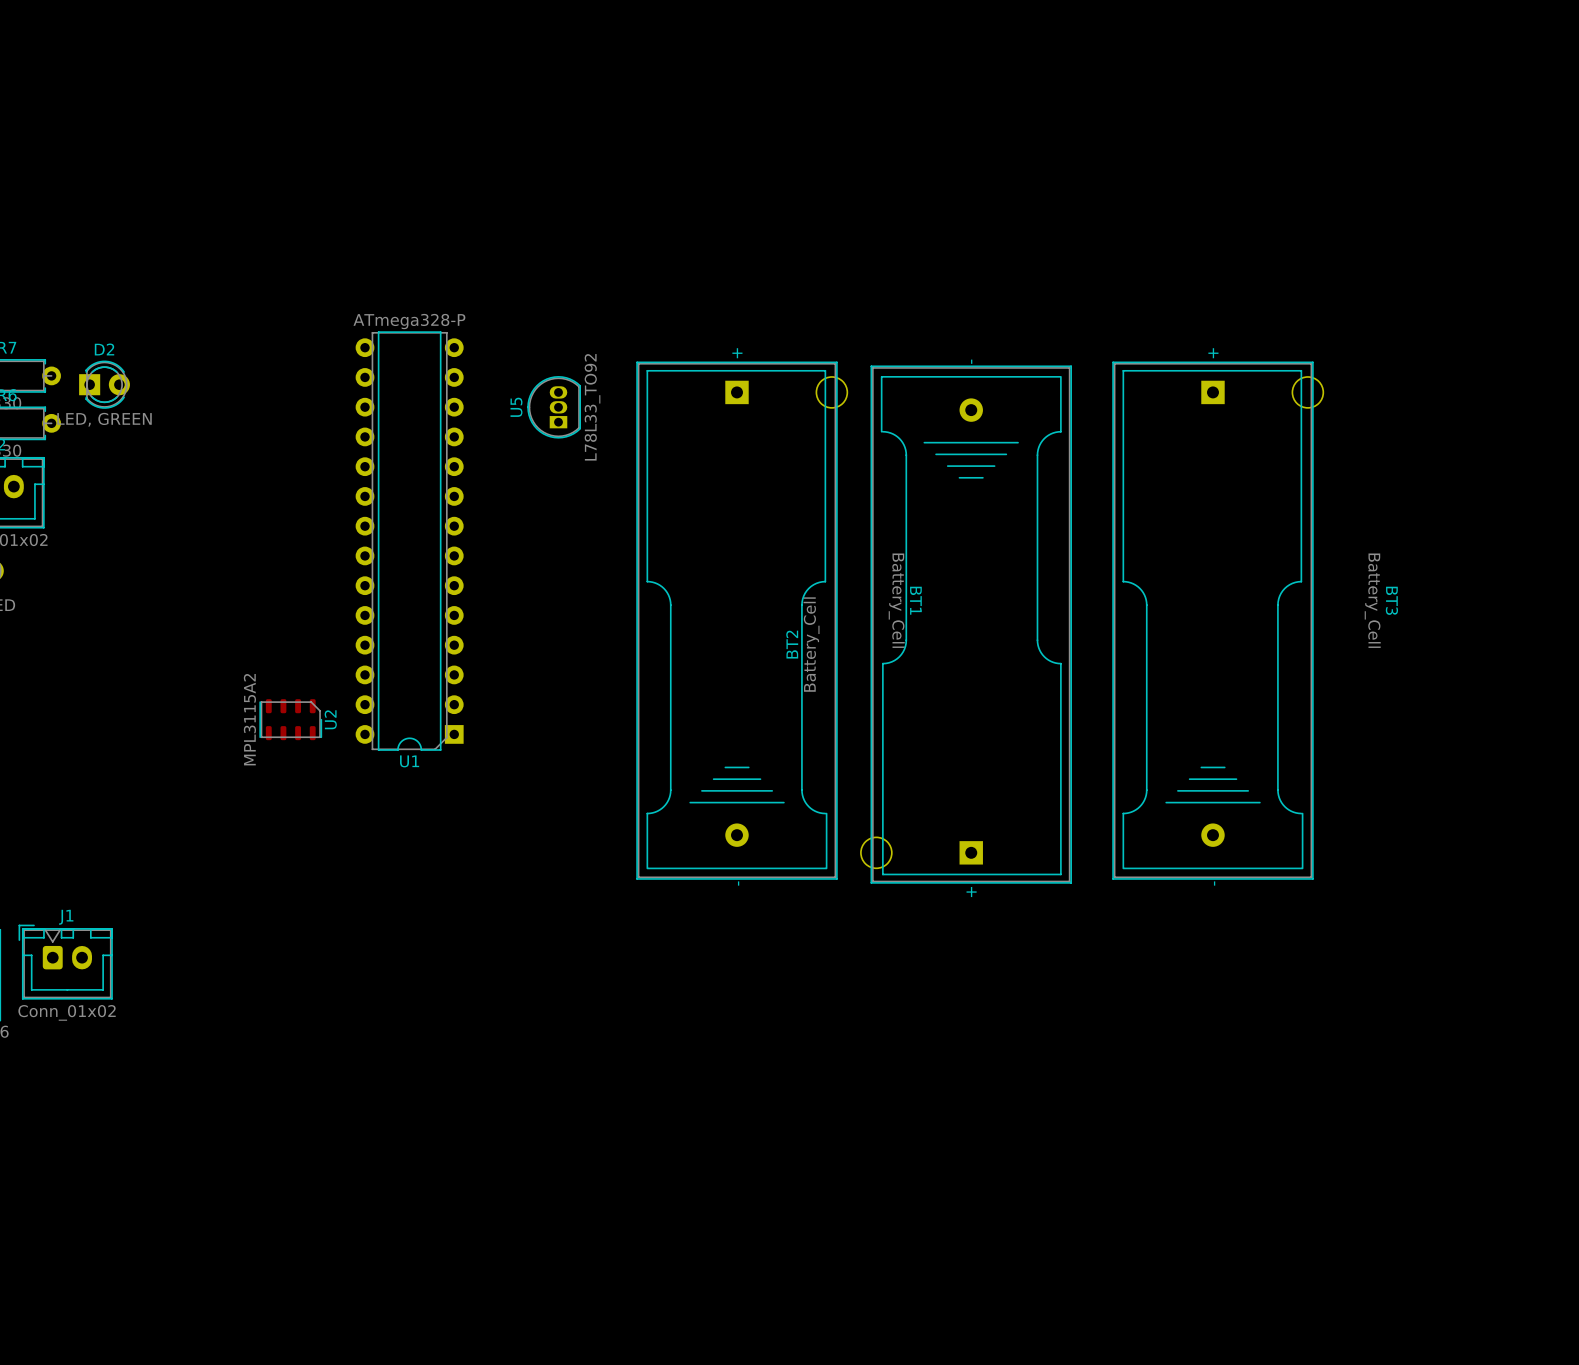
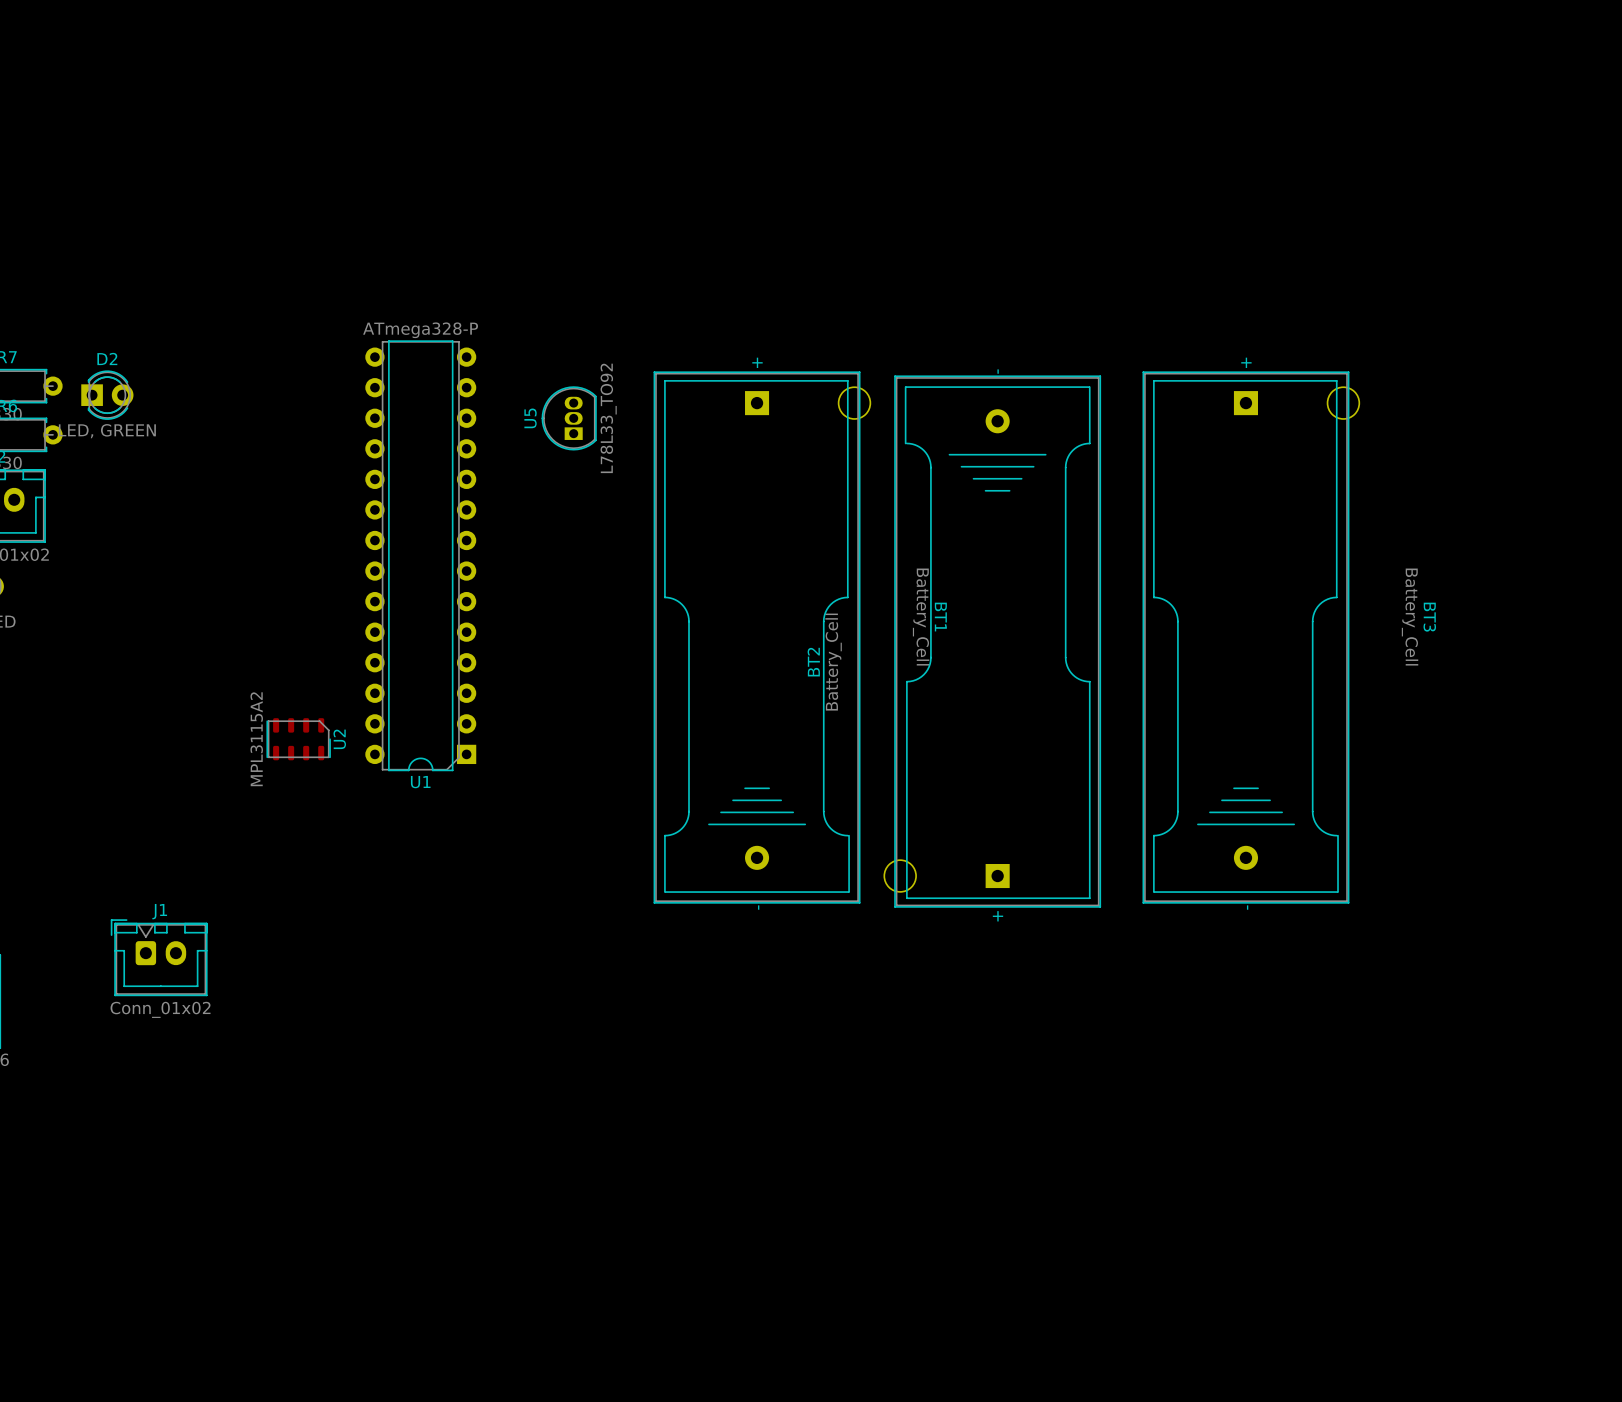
J1 position: (65, 962) -> (159, 957)

